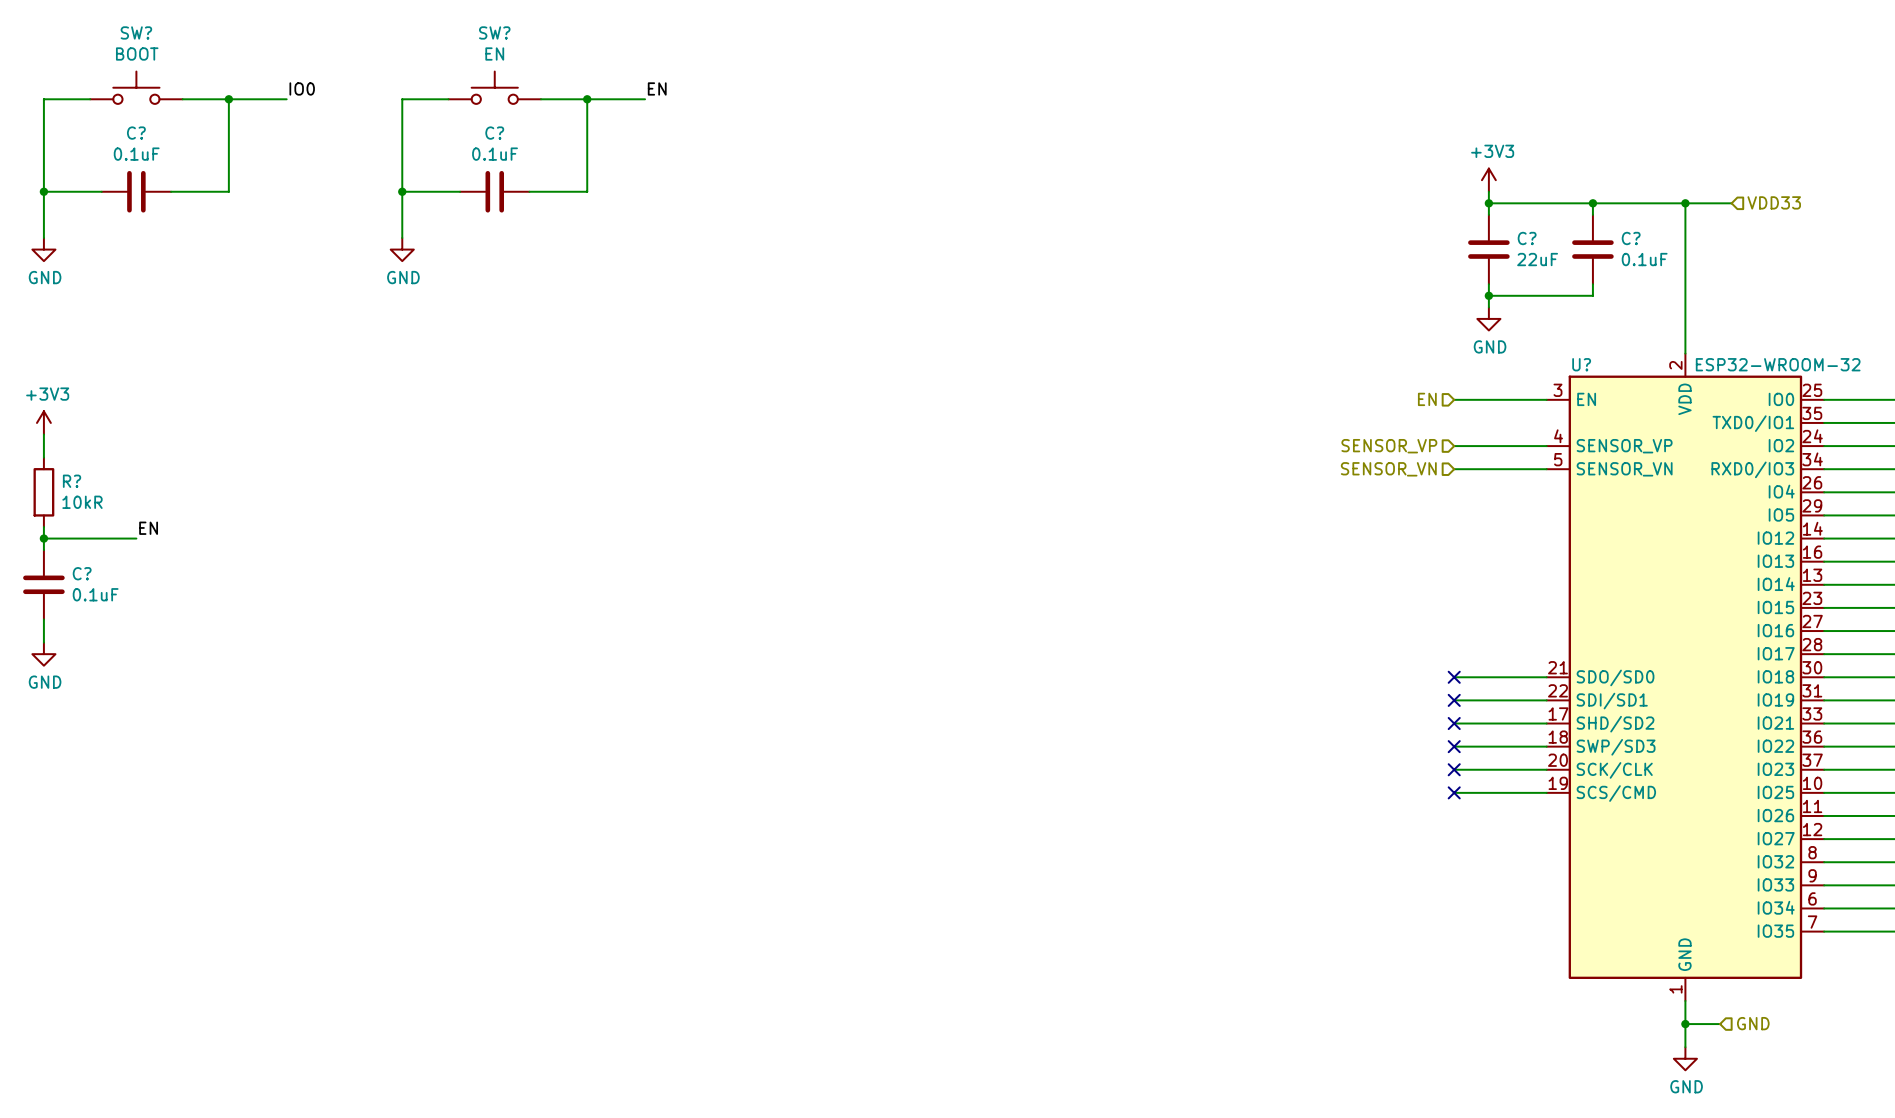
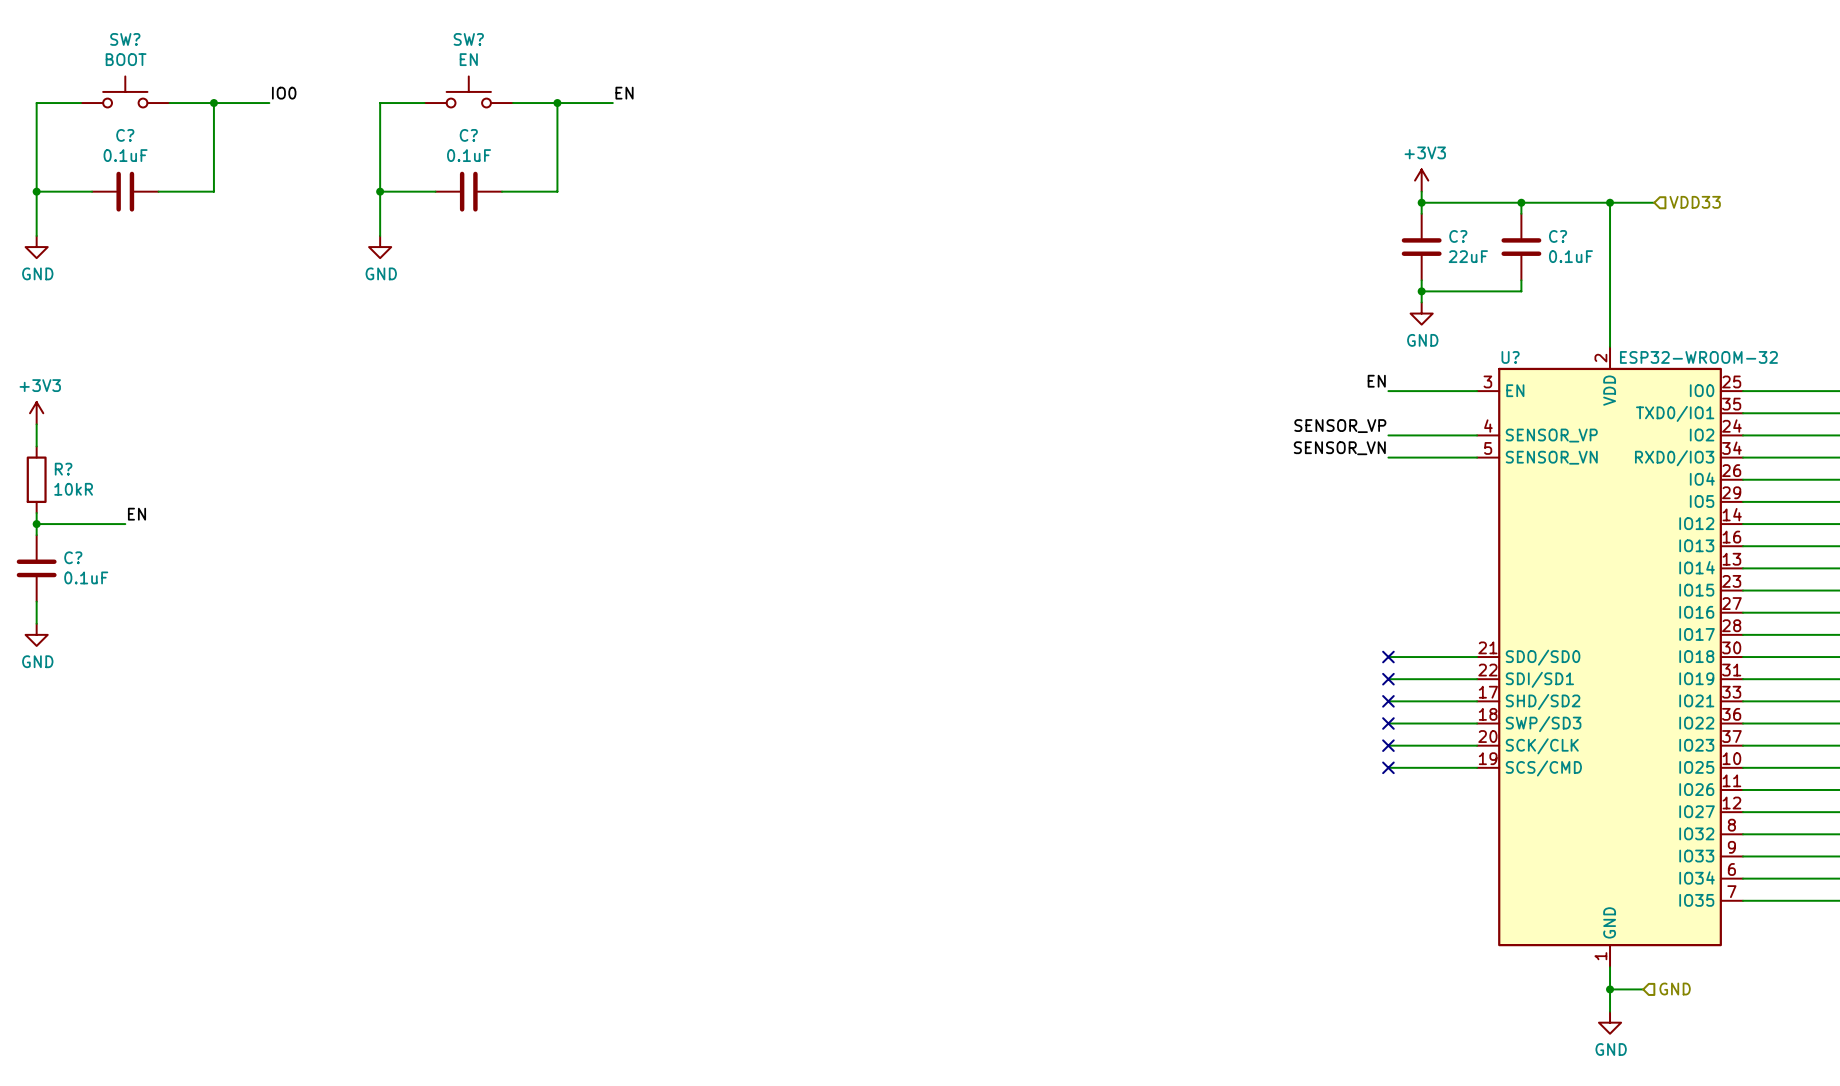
label: none -> EN (1376, 381)
hierarchical label: EN (1427, 399) -> none
label: none -> SENSOR_VP (1340, 426)
hierarchical label: SENSOR_VP (1389, 446) -> none
label: none -> SENSOR_VN (1339, 448)
hierarchical label: SENSOR_VN (1388, 469) -> none

